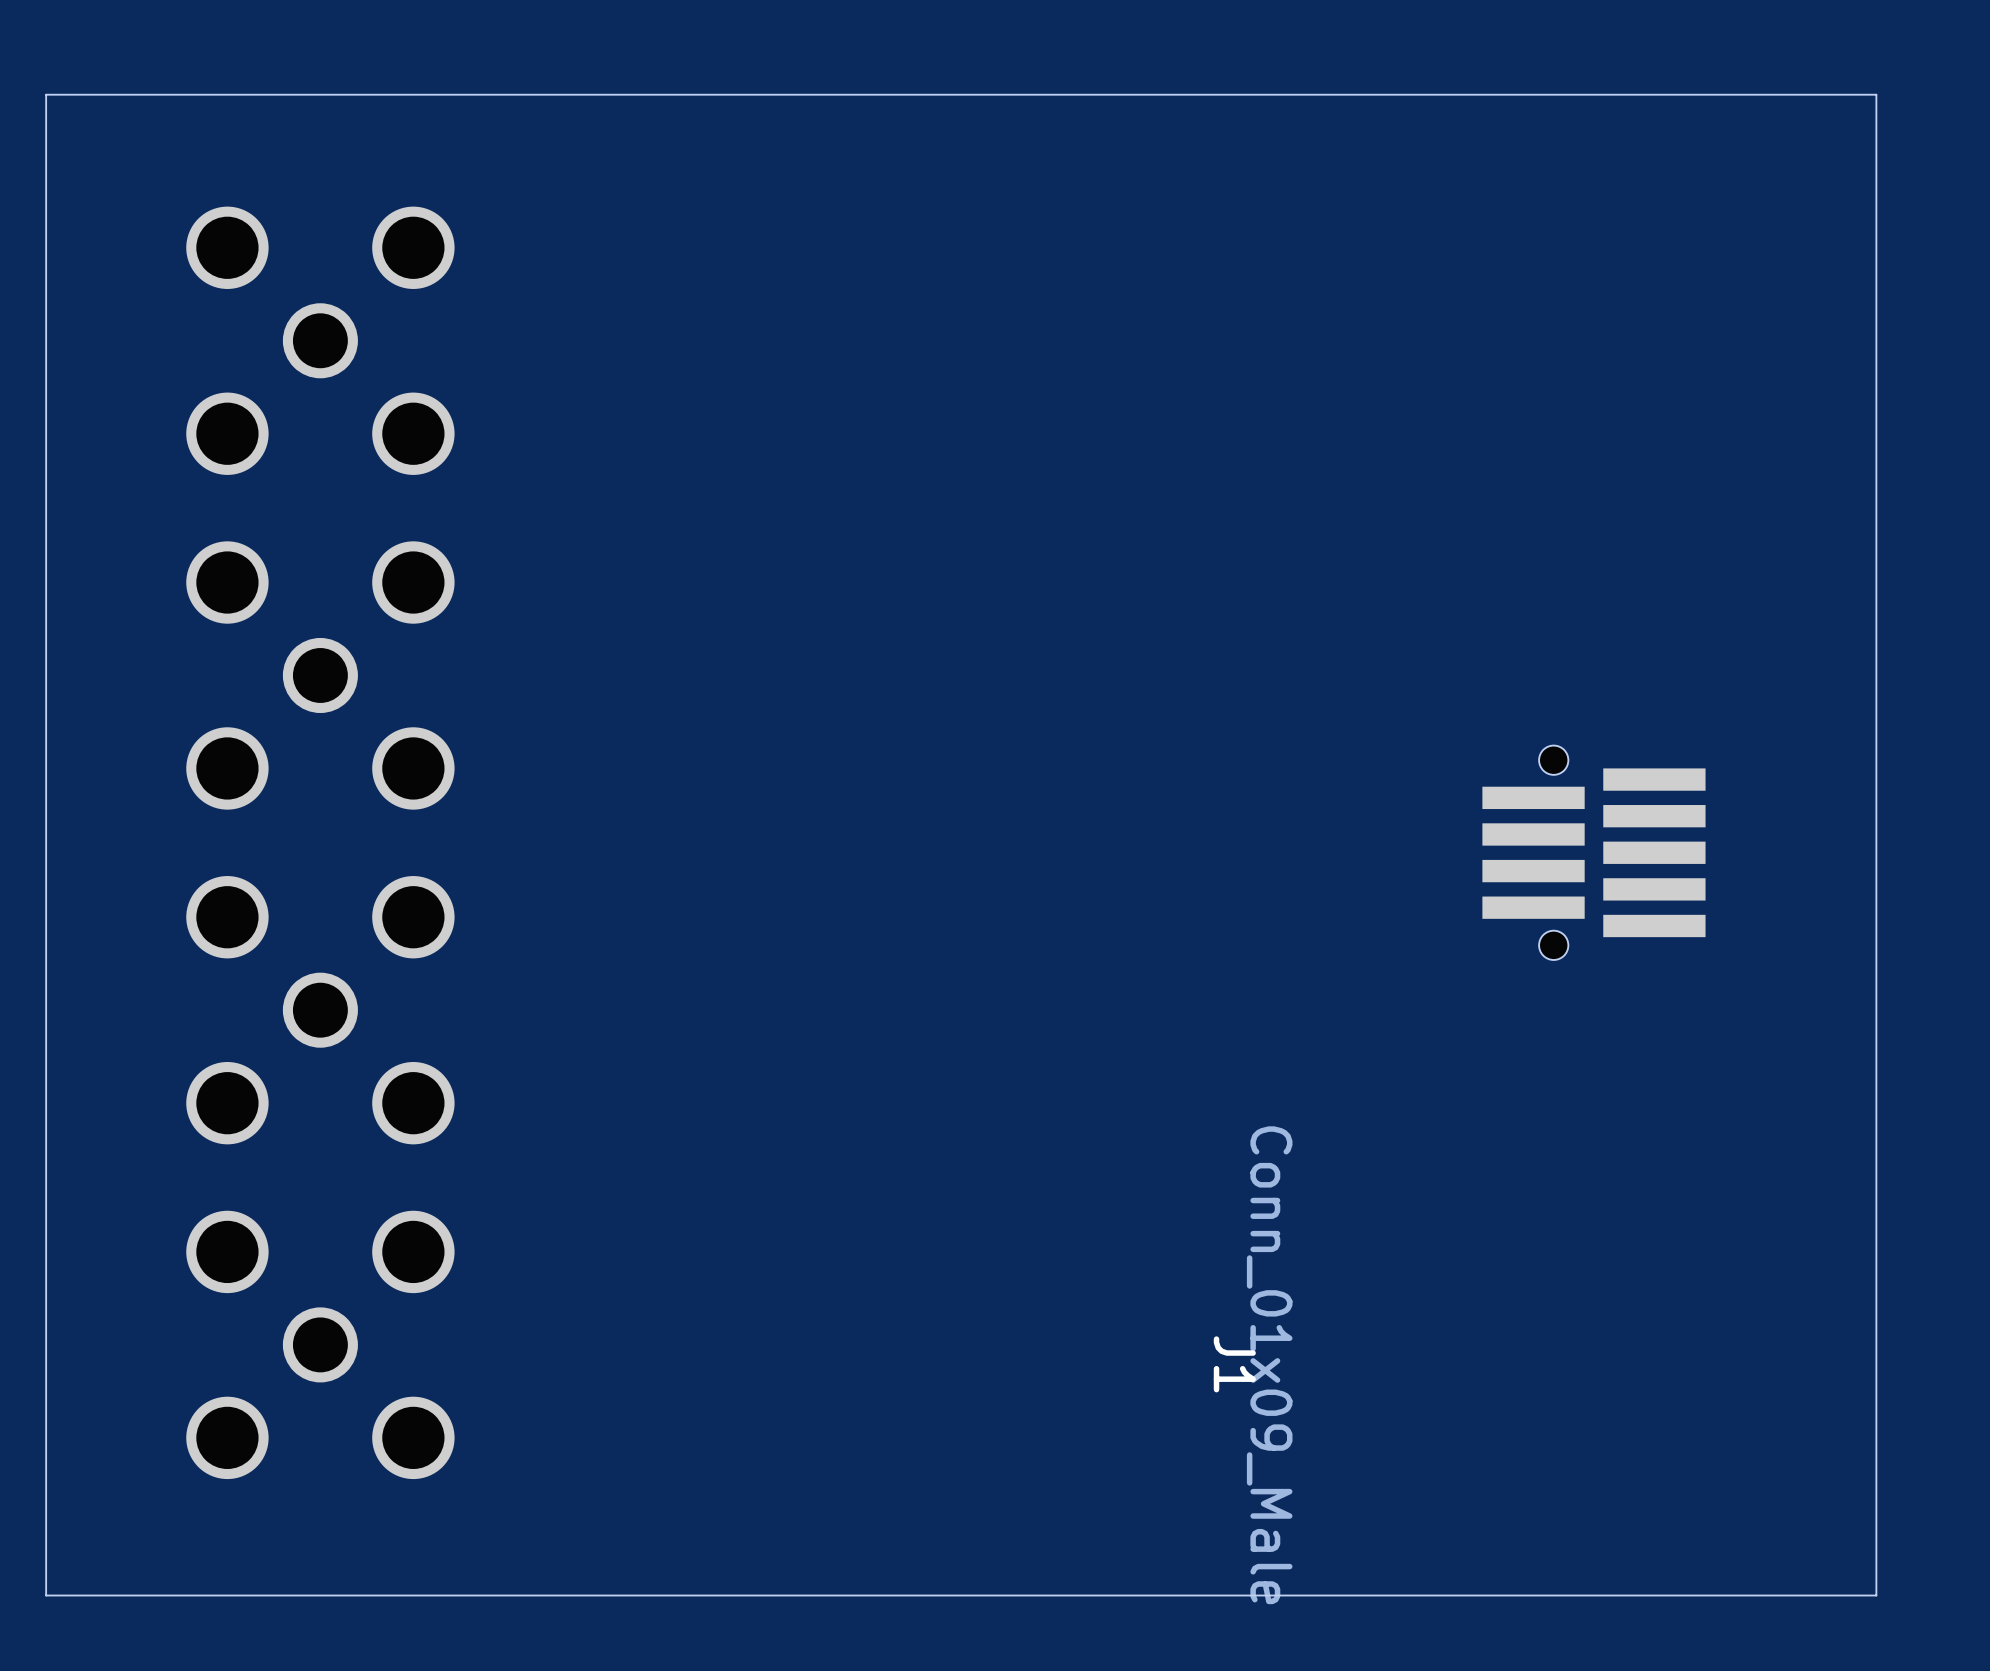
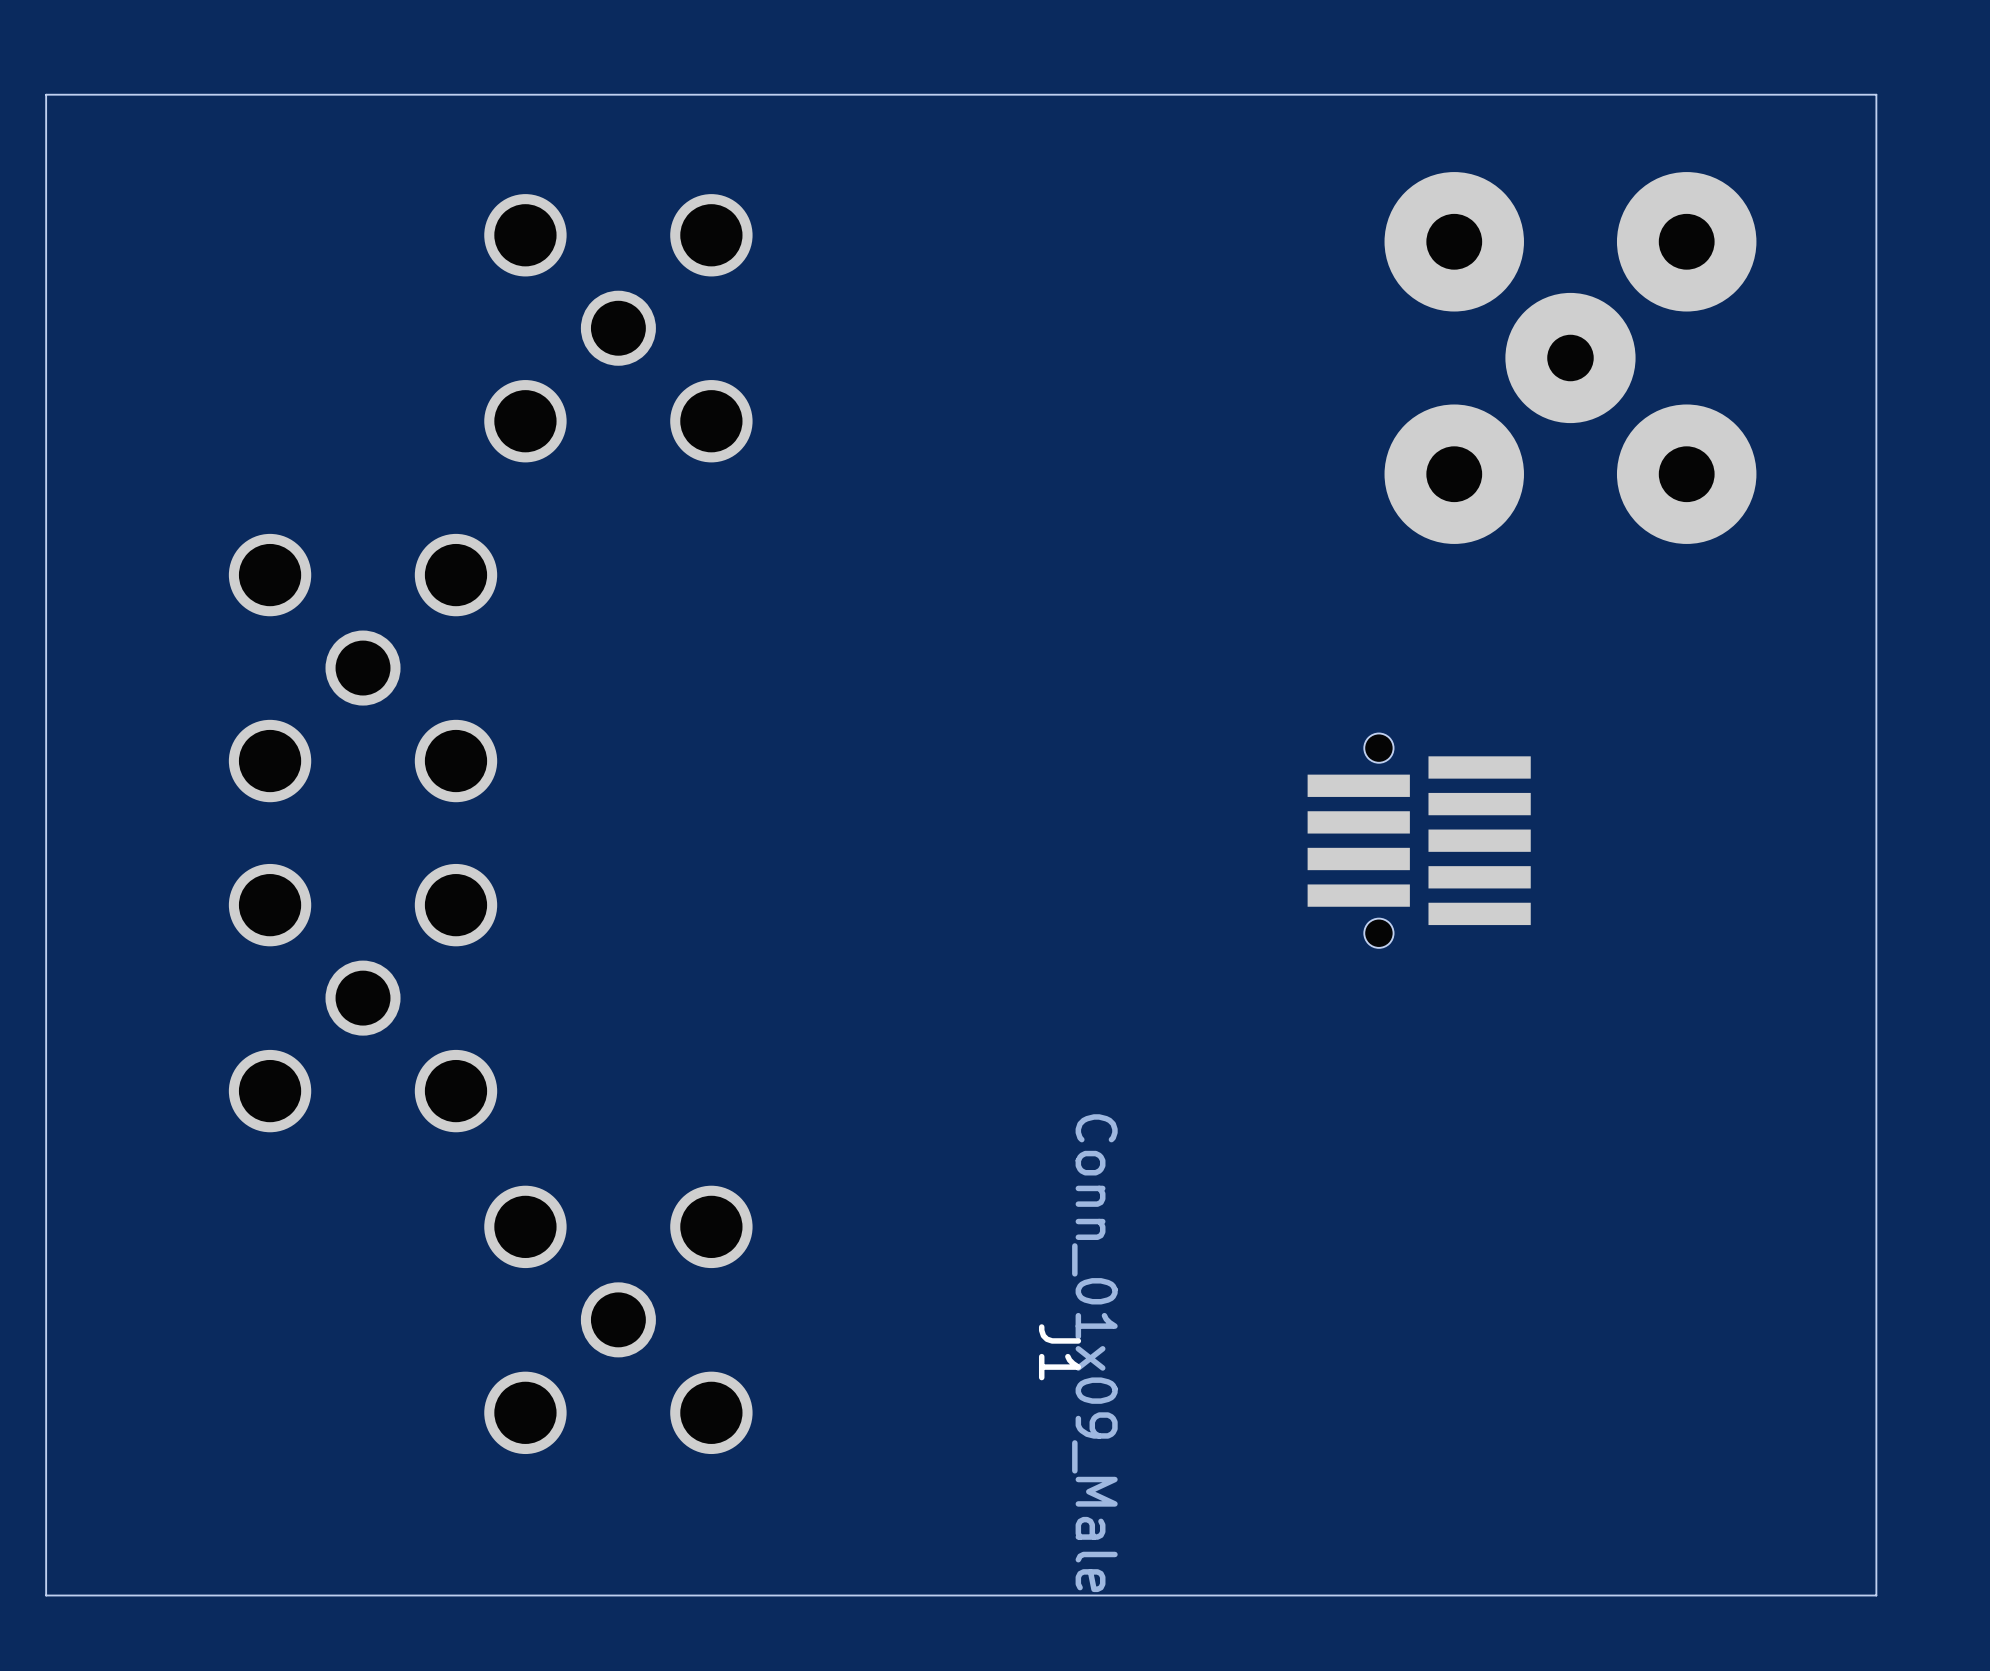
part: none -> (618, 328)
part: (320, 340) -> none
part: none -> (1570, 358)
part position: (320, 675) -> (363, 668)
J1 position: (1593, 852) -> (1419, 840)
part position: (320, 1010) -> (363, 998)
part: none -> (618, 1319)
part: (320, 1344) -> none

